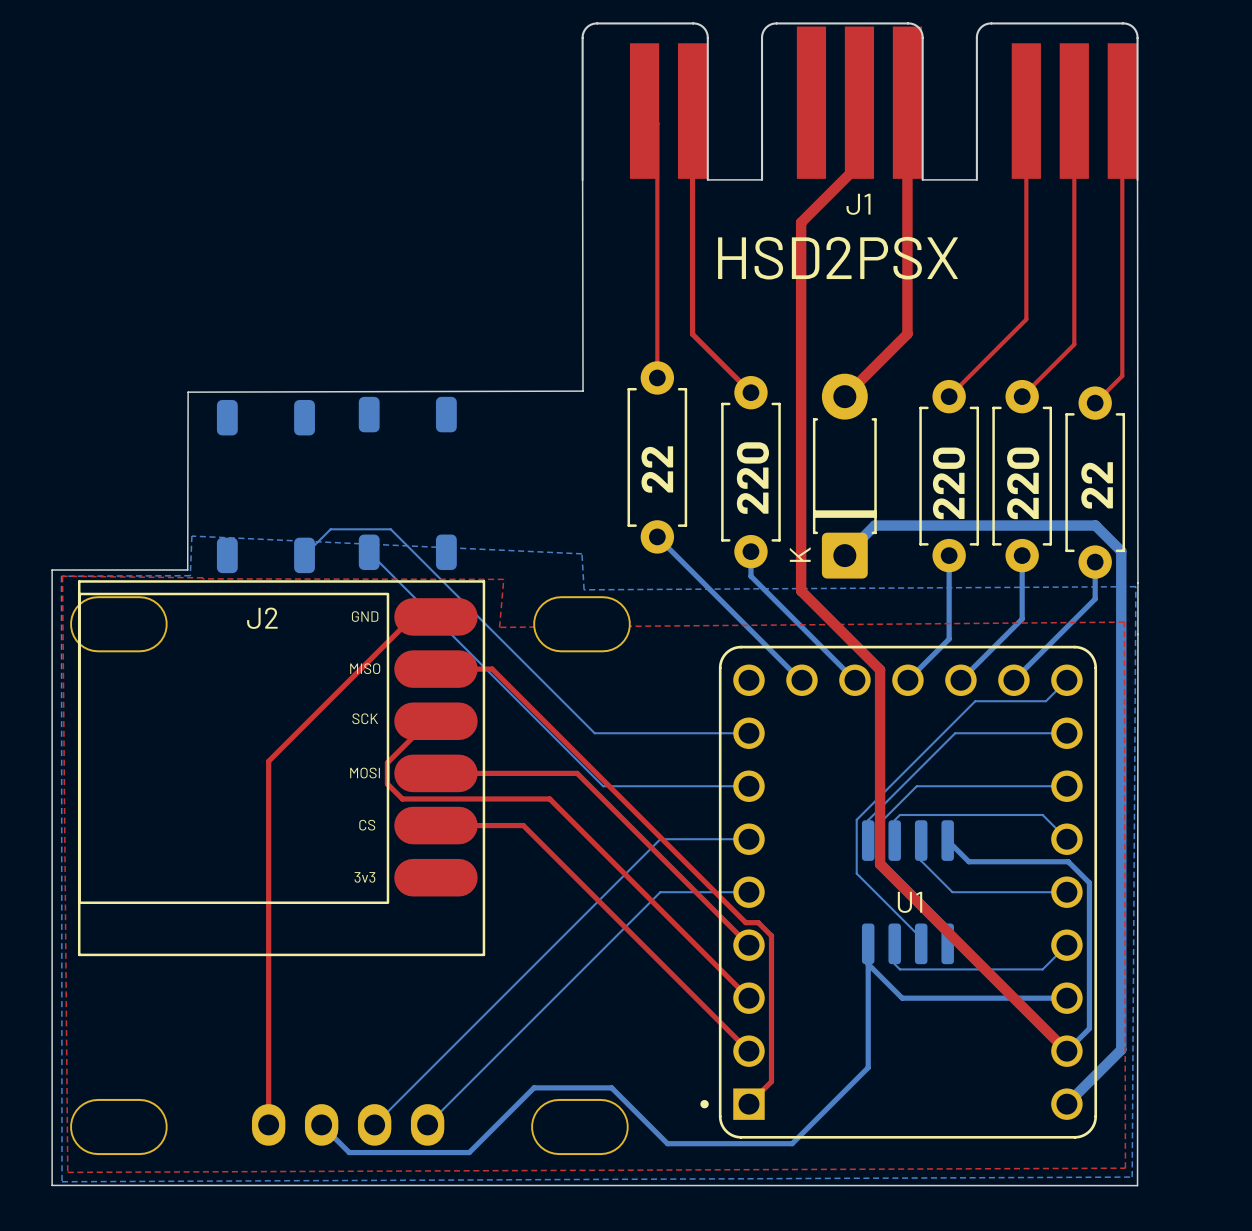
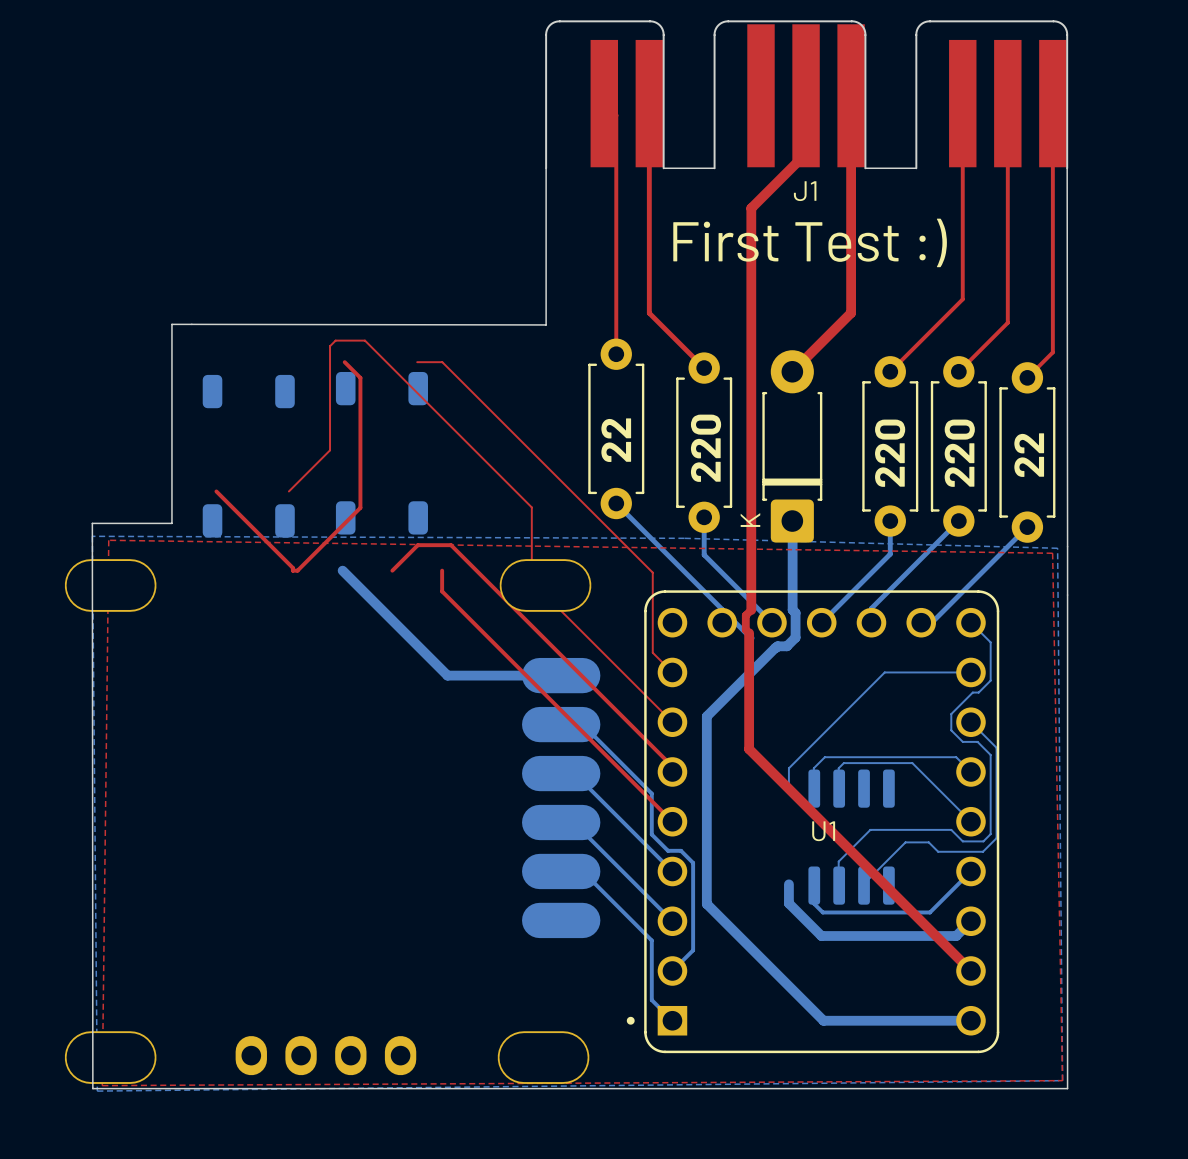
board edge: (582, 179) (583, 391) (188, 392) (187, 570) (52, 570) (52, 1185) (1137, 1185) (1137, 634) -> (546, 168) (546, 324) (171, 324) (171, 523) (92, 523) (92, 1088) (1067, 1088) (1067, 595)
text: HSD2PSX (838, 258) -> First Test :) (810, 242)
top track: none -> (344, 362) (360, 377) (360, 507) (297, 570) (292, 570) (292, 567) (216, 491)
top track: none -> (417, 362) (442, 362) (652, 572) (652, 652) (672, 672)
top track: none -> (288, 491) (330, 450) (330, 346) (335, 340) (364, 340) (531, 507) (531, 581) (672, 722)
bottom zone outline: (191, 536) (190, 575) (61, 576) (62, 1181) (1132, 1177) (1135, 586) (584, 589) (581, 553) (191, 536) -> (92, 536) (97, 1091) (1062, 1080) (1057, 548) (684, 538) (92, 536)
bottom track: (369, 552) (603, 786) (748, 786) -> none
bottom track: (304, 555) (330, 529) (390, 529) (594, 733) (748, 733) -> none
bottom track: (844, 555) (874, 525) (1095, 525) (1121, 551) (1121, 1049) (1066, 1104) -> (792, 521) (792, 609) (795, 612) (795, 637) (786, 646) (775, 647) (706, 716) (706, 904) (823, 1020) (970, 1020)
bottom track: (1022, 555) (1022, 619) (960, 680) -> (958, 521) (871, 608) (871, 622)
bottom track: (1095, 562) (1095, 599) (1013, 680) -> (1027, 527) (931, 622) (921, 622)
top zone outline: (62, 576) (202, 578) (503, 579) (499, 627) (1124, 622) (1125, 1168) (67, 1172) (62, 576) -> (108, 540) (102, 1085) (1062, 1080) (1052, 553) (108, 540)
bottom track: (750, 576) (854, 680) -> (704, 540) (704, 554) (771, 622) (760, 622)
top track: (801, 590) (880, 669) (880, 864) (1066, 1051) -> (751, 554) (751, 609) (745, 615) (745, 629) (749, 633) (749, 749) (970, 970)
bottom track: (949, 590) (949, 639) (907, 680) -> (890, 554) (821, 622)
bottom track: none -> (342, 570) (447, 675) (561, 675)
top track: none -> (392, 570) (417, 545) (451, 545) (672, 766) (672, 771)
top track: none -> (442, 570) (442, 591) (672, 821)
top track: (435, 616) (413, 616) (268, 761) (268, 1124) -> none
bottom track: none -> (970, 622) (990, 642) (990, 680) (978, 692) (972, 692) (951, 714) (951, 730) (962, 741) (977, 741) (990, 754) (990, 834) (983, 841) (962, 841) (951, 829) (870, 829) (838, 861) (838, 884)
top track: (435, 669) (492, 669) (745, 922) (758, 922) (771, 935) (771, 1081) (748, 1104) -> none
bottom track: (1066, 680) (1045, 701) (975, 701) (856, 819) (856, 873) (921, 938) (921, 943) -> none
bottom track: none -> (970, 672) (884, 672) (788, 768) (788, 787)
top track: (435, 721) (429, 721) (387, 762) (387, 783) (402, 798) (549, 798) (748, 998) -> none
bottom track: (1066, 733) (955, 733) (868, 820) (868, 840) -> none
J2 side: top (281, 768) -> bottom (561, 798)
bottom track: none -> (970, 722) (996, 747) (996, 838) (982, 851) (938, 851) (928, 842) (905, 842) (863, 884)
bottom track: none -> (561, 724) (582, 724) (651, 793) (651, 834) (668, 850) (681, 850) (693, 862) (693, 950) (672, 970)
top track: (435, 773) (577, 773) (748, 945) -> none
bottom track: (1066, 786) (916, 786) (883, 819) (883, 861) (947, 925) (947, 943) -> none
bottom track: none -> (970, 771) (956, 757) (824, 757) (813, 768) (813, 787)
bottom track: none -> (561, 773) (574, 773) (672, 871)
top track: (435, 825) (523, 825) (748, 1051) -> none
bottom track: (748, 839) (660, 839) (374, 1124) -> none
bottom track: none -> (838, 787) (838, 768) (843, 763) (912, 763) (970, 821)
bottom track: (1066, 839) (1042, 815) (899, 815) (894, 820) (894, 840) -> none
bottom track: (921, 840) (921, 860) (952, 892) (1066, 892) -> none
bottom track: (947, 840) (968, 861) (1068, 861) (1089, 882) (1089, 1028) (1066, 1051) -> none
bottom track: none -> (561, 822) (573, 822) (672, 921)
bottom track: (748, 892) (660, 892) (427, 1124) -> none
U1 position: (898, 892) -> (813, 821)
bottom track: none -> (561, 871) (582, 871) (651, 940) (651, 1000) (672, 1020)
bottom track: none -> (970, 871) (929, 912) (822, 912) (813, 903) (813, 884)
bottom track: none -> (788, 884) (788, 903) (821, 936) (956, 936) (970, 921)
bottom track: (868, 943) (868, 1067) (792, 1143) (667, 1143) (611, 1087) (534, 1087) (469, 1152) (349, 1152) (321, 1124) -> none
bottom track: (894, 943) (894, 964) (899, 969) (1042, 969) (1066, 945) -> none
bottom track: (868, 964) (902, 998) (1066, 998) -> none

